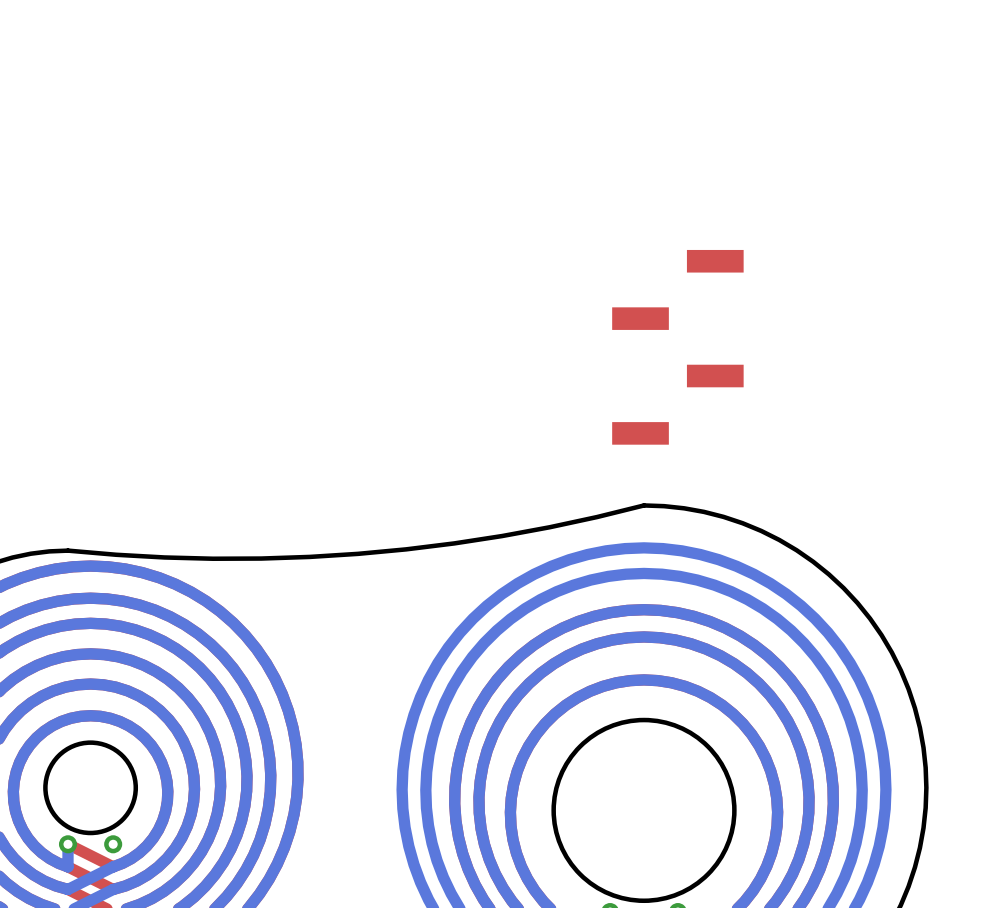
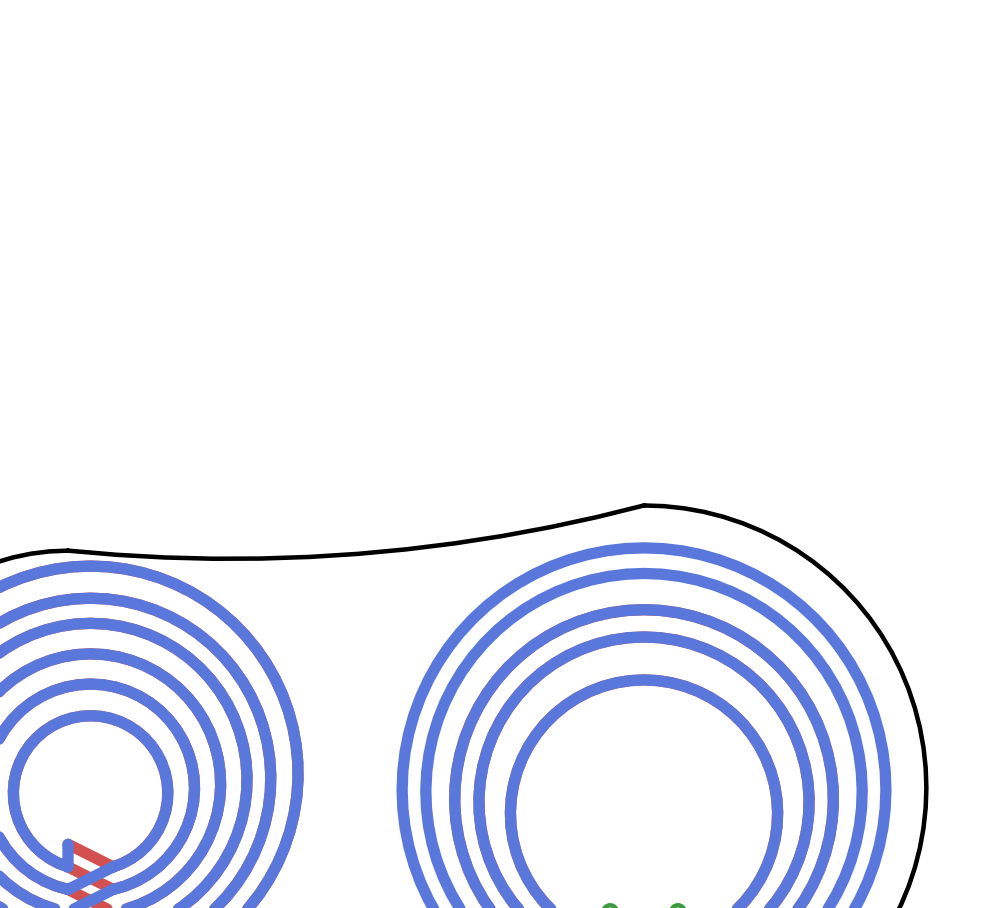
part: (677, 347) -> none
round board edge: [551, 717, 737, 904] -> none
round board edge: [43, 740, 139, 836] -> none
via: (68, 844) -> none
via: (113, 844) -> none

